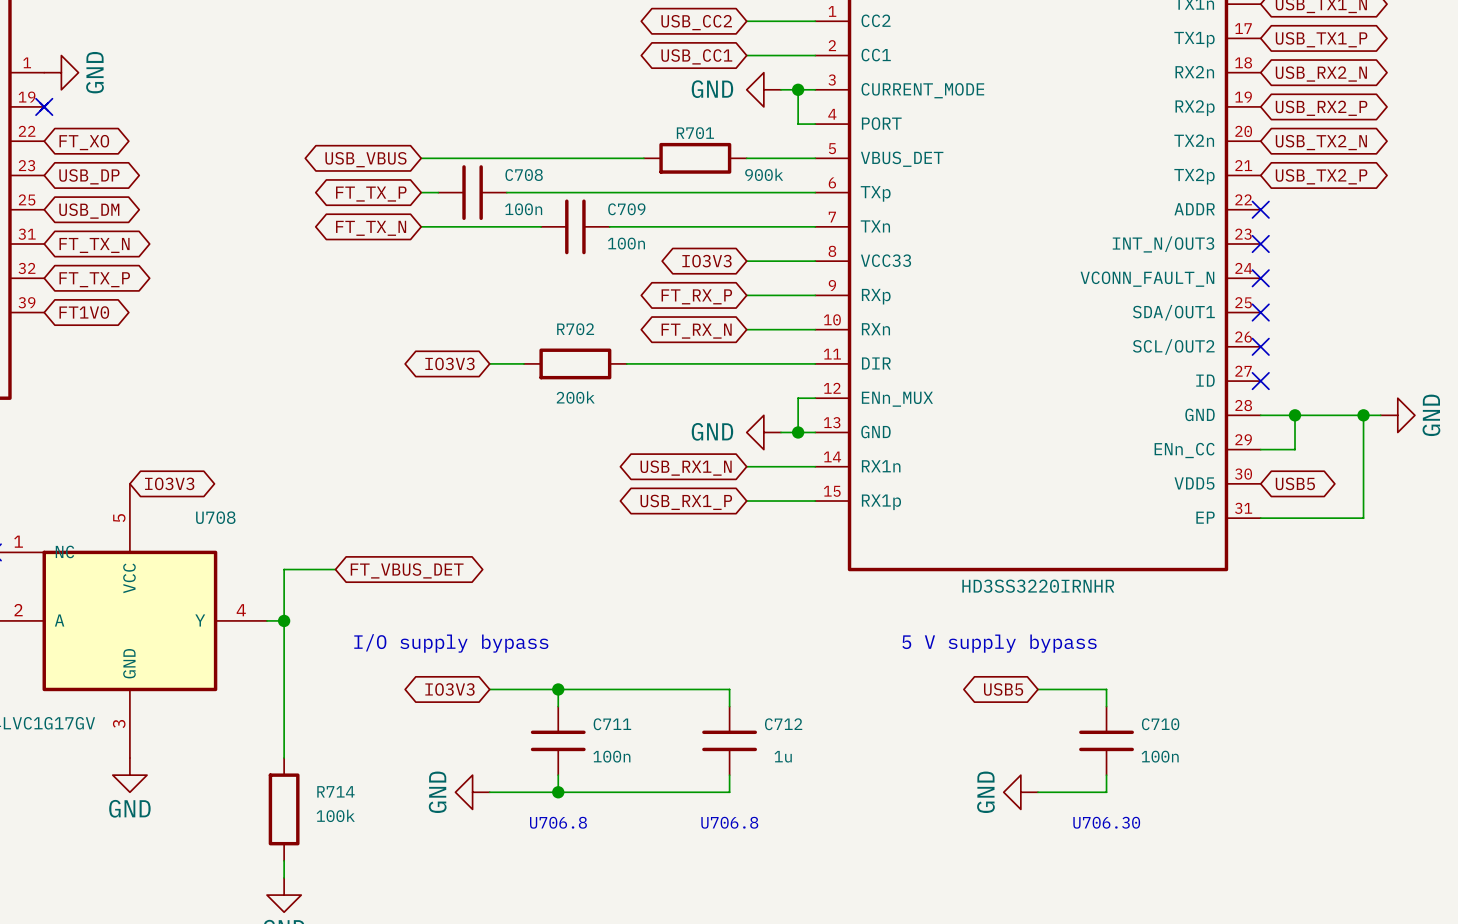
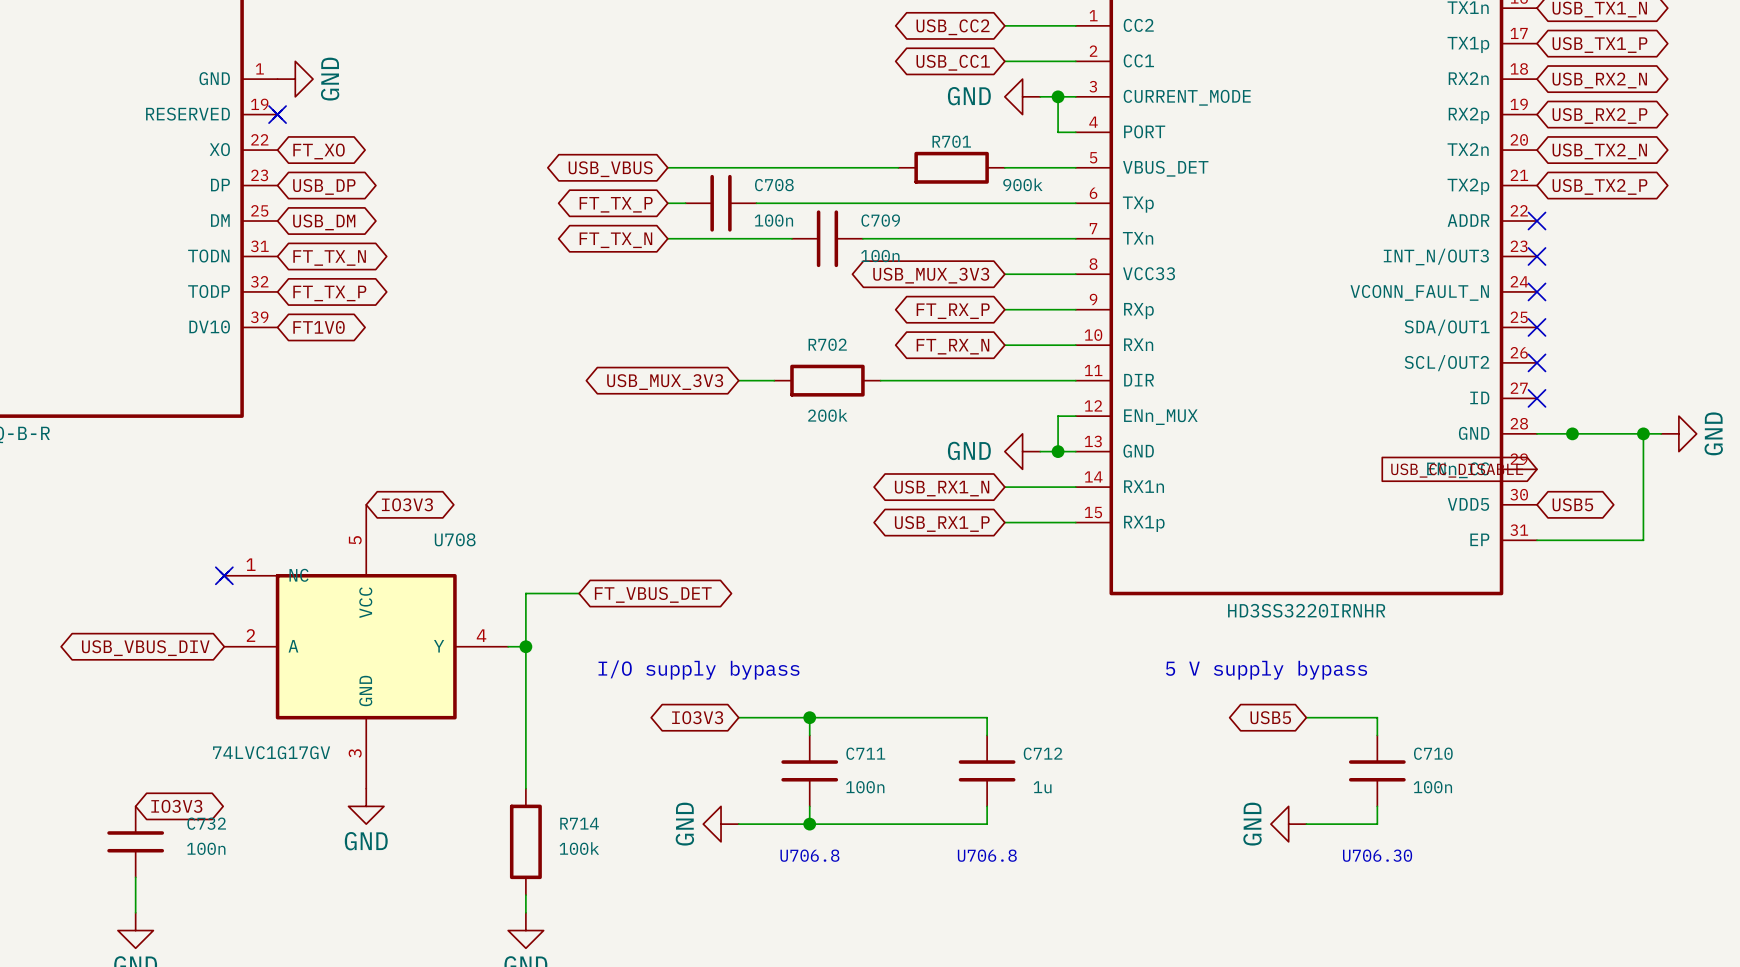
global label: IO3V3 (706, 261) -> USB_MUX_3V3 (931, 275)
global label: IO3V3 (449, 363) -> USB_MUX_3V3 (665, 382)
wire: (1295, 415) (1295, 449) (1260, 449) -> none
global label: none -> USB_CC_DISABLE (1457, 470)

